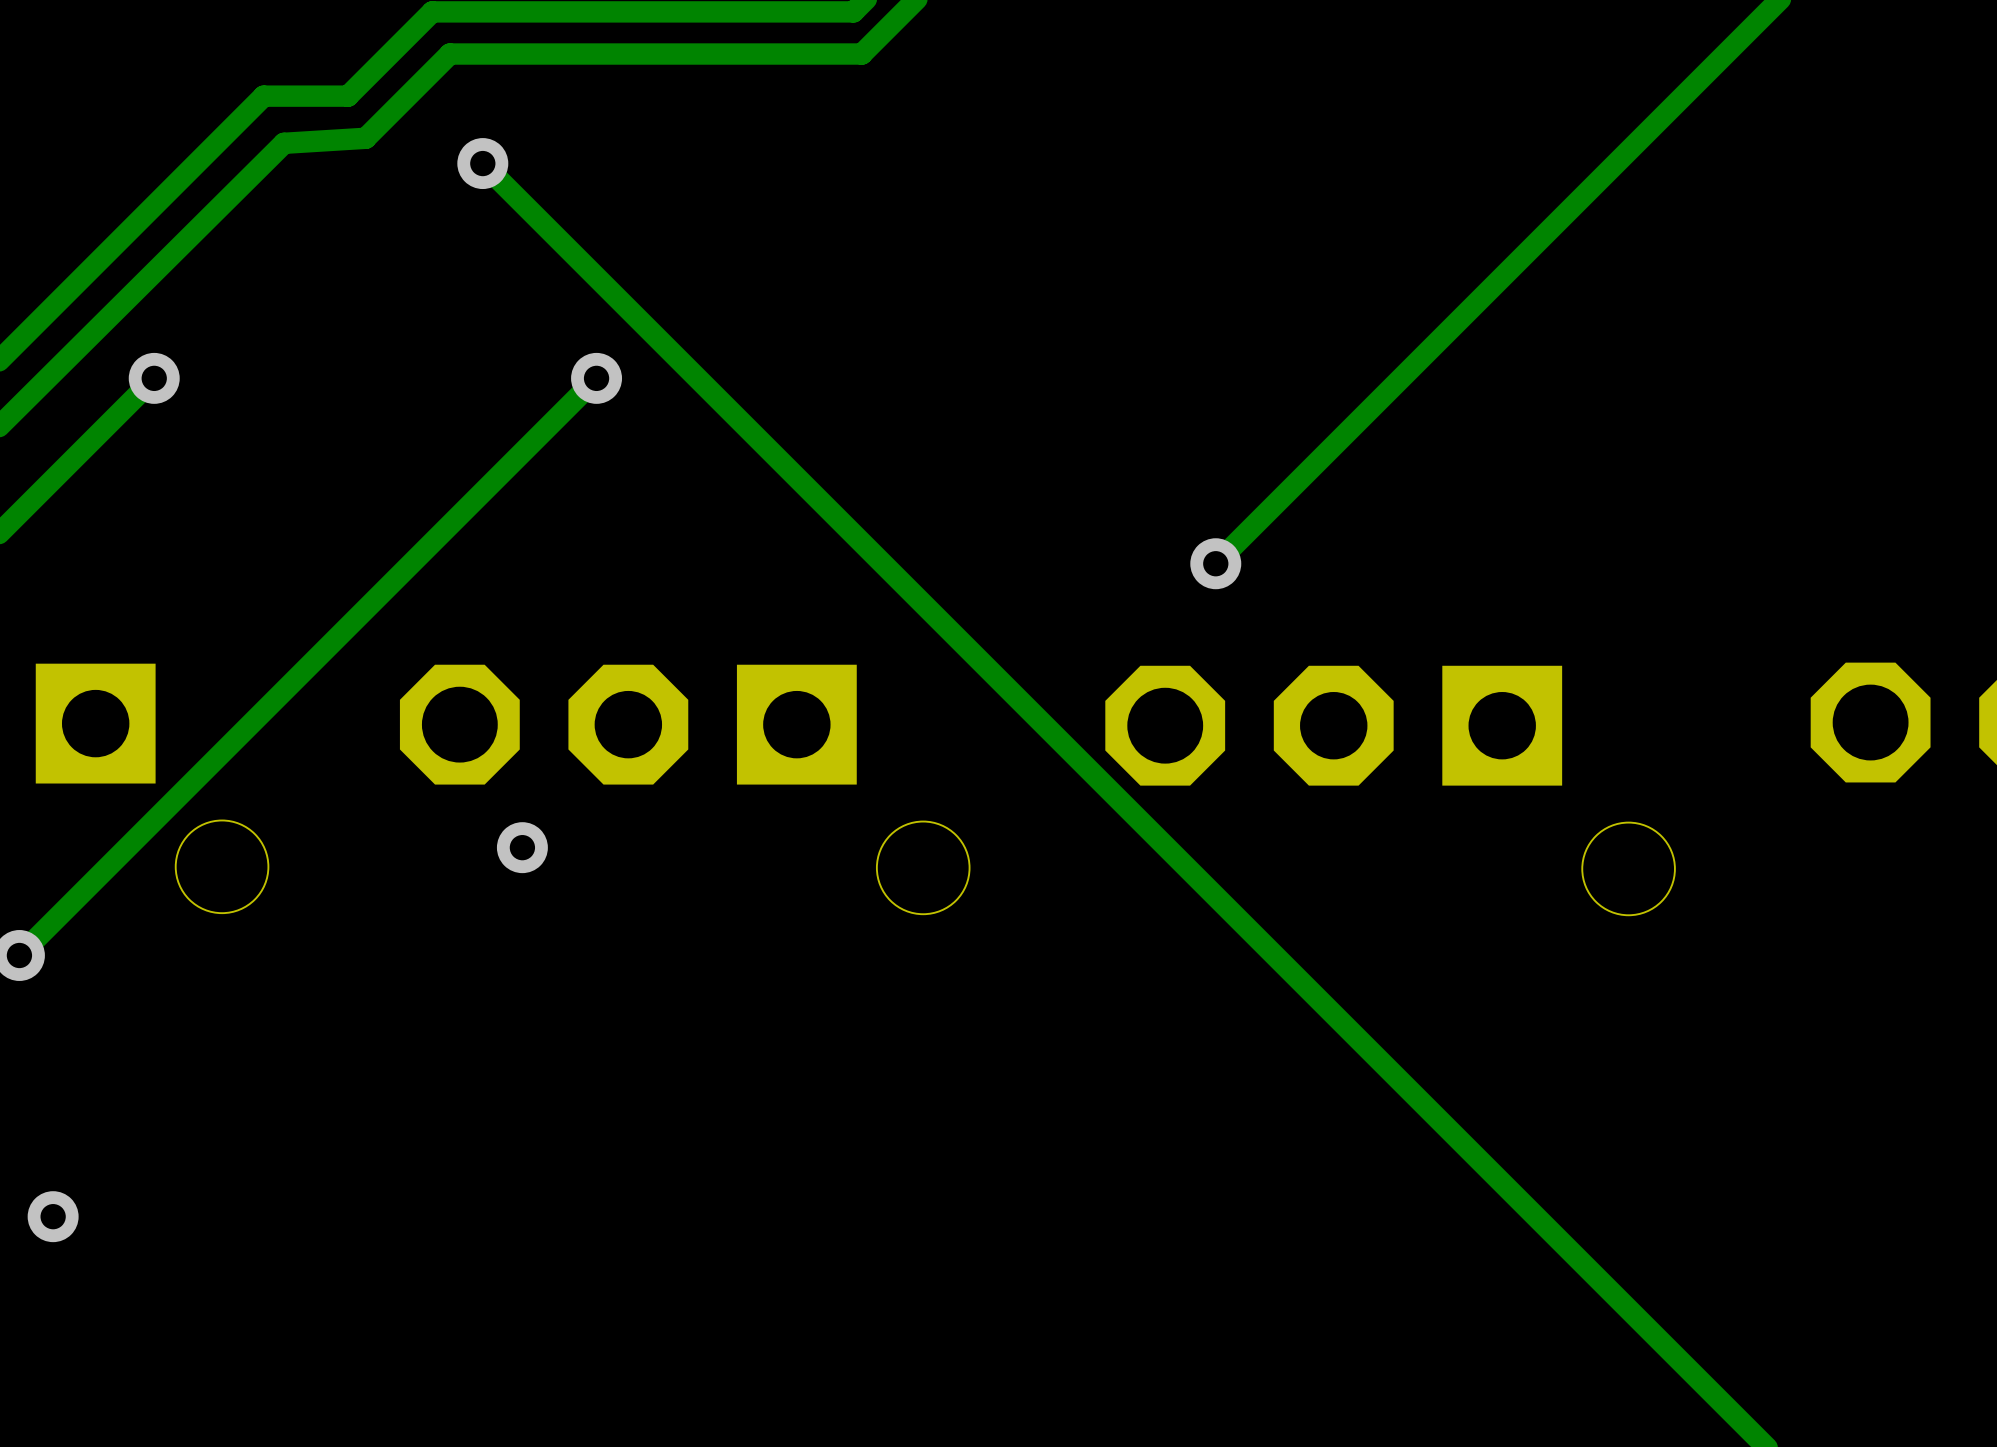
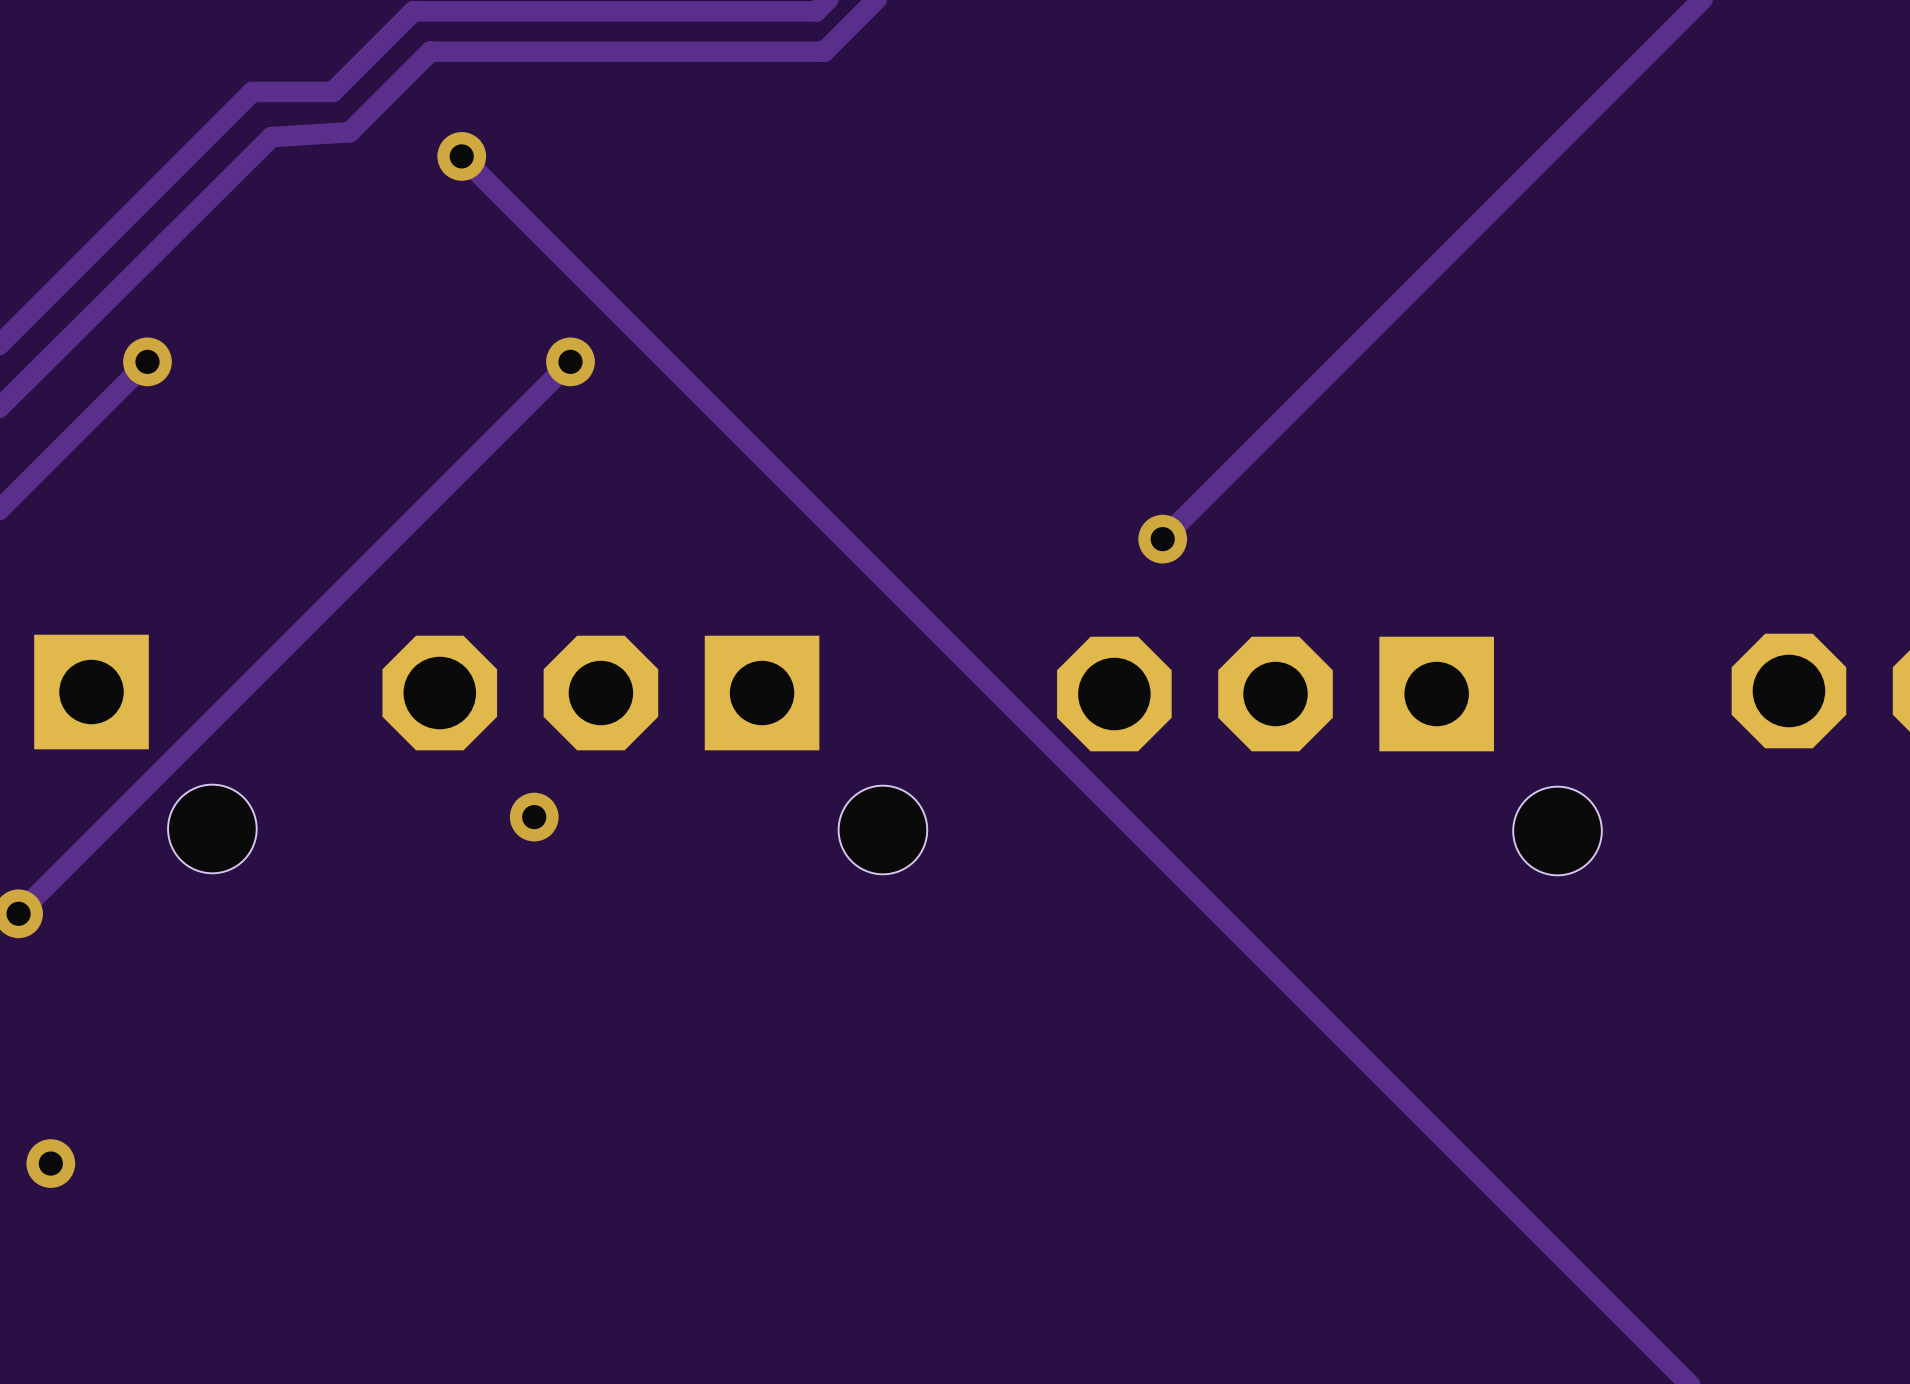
via position: (522, 847) -> (534, 817)

